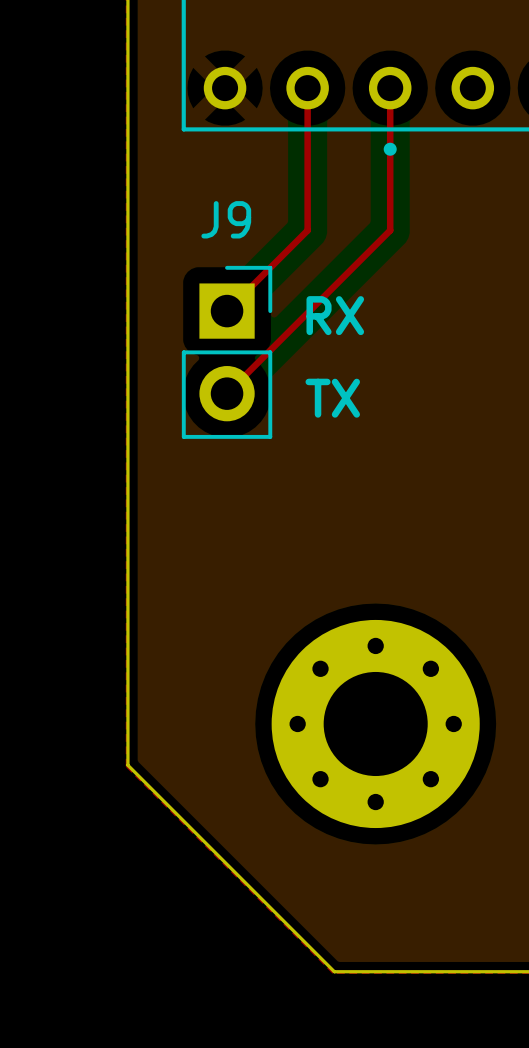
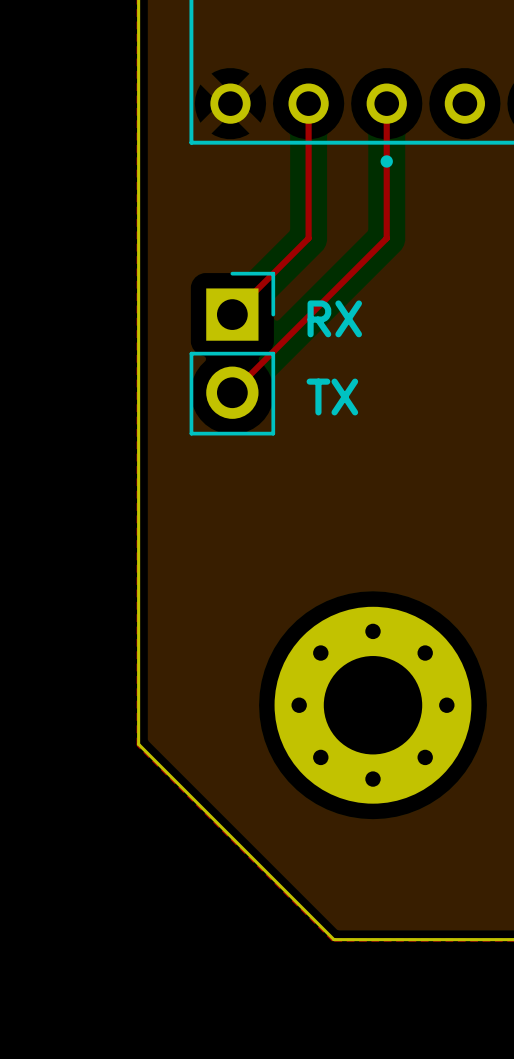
J9 name: J9 (226, 219) -> none

